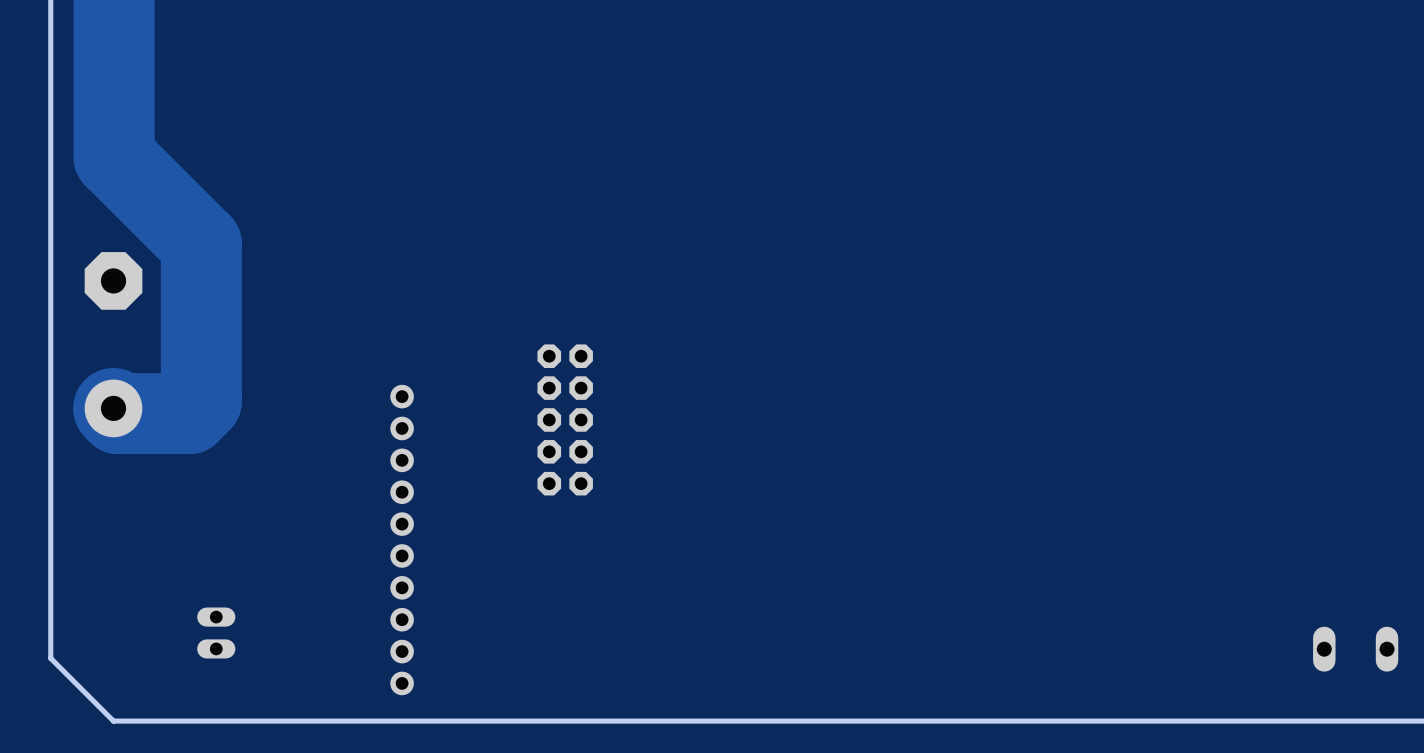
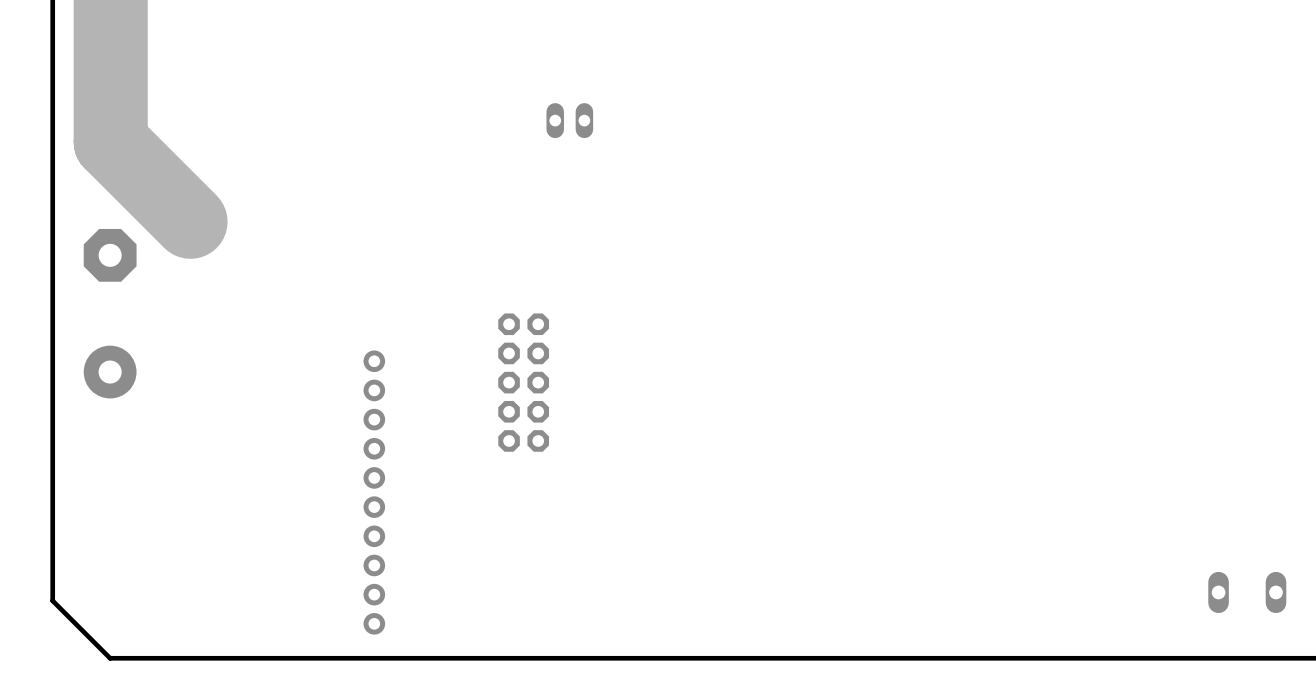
part: none -> (569, 120)
track: (201, 244) (201, 401) (188, 413) (118, 413) (113, 408) -> none
part: (216, 633) -> none

